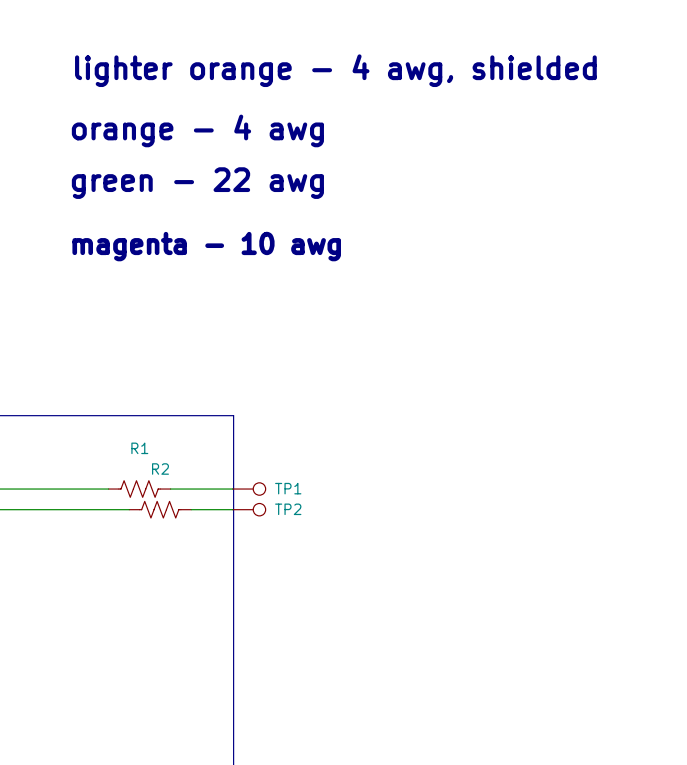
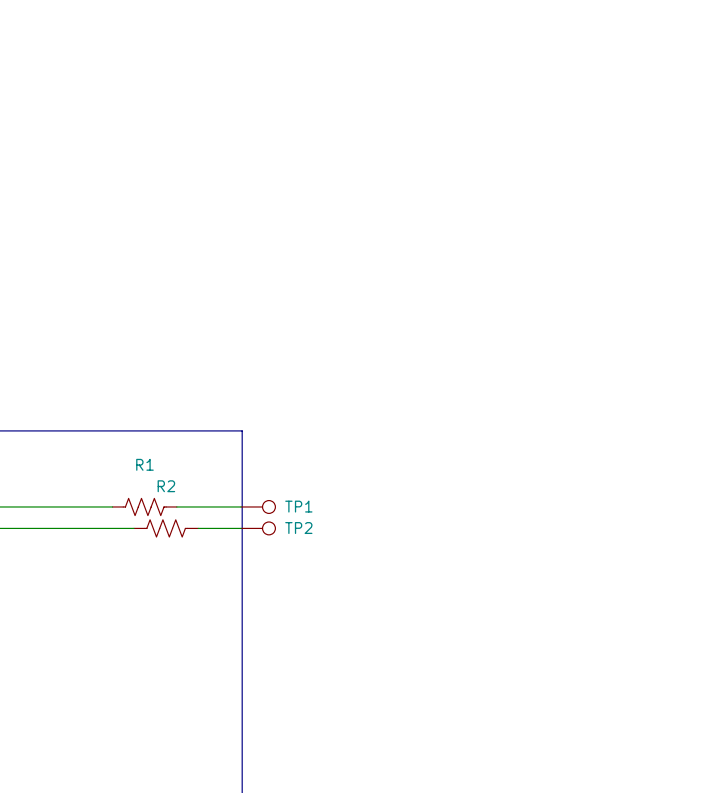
text: lighter orange - 4 awg, shielded (335, 70) -> none
text: orange - 4 awg (197, 130) -> none
text: green - 22 awg (197, 183) -> none
text: magenta - 10 awg (206, 246) -> none

